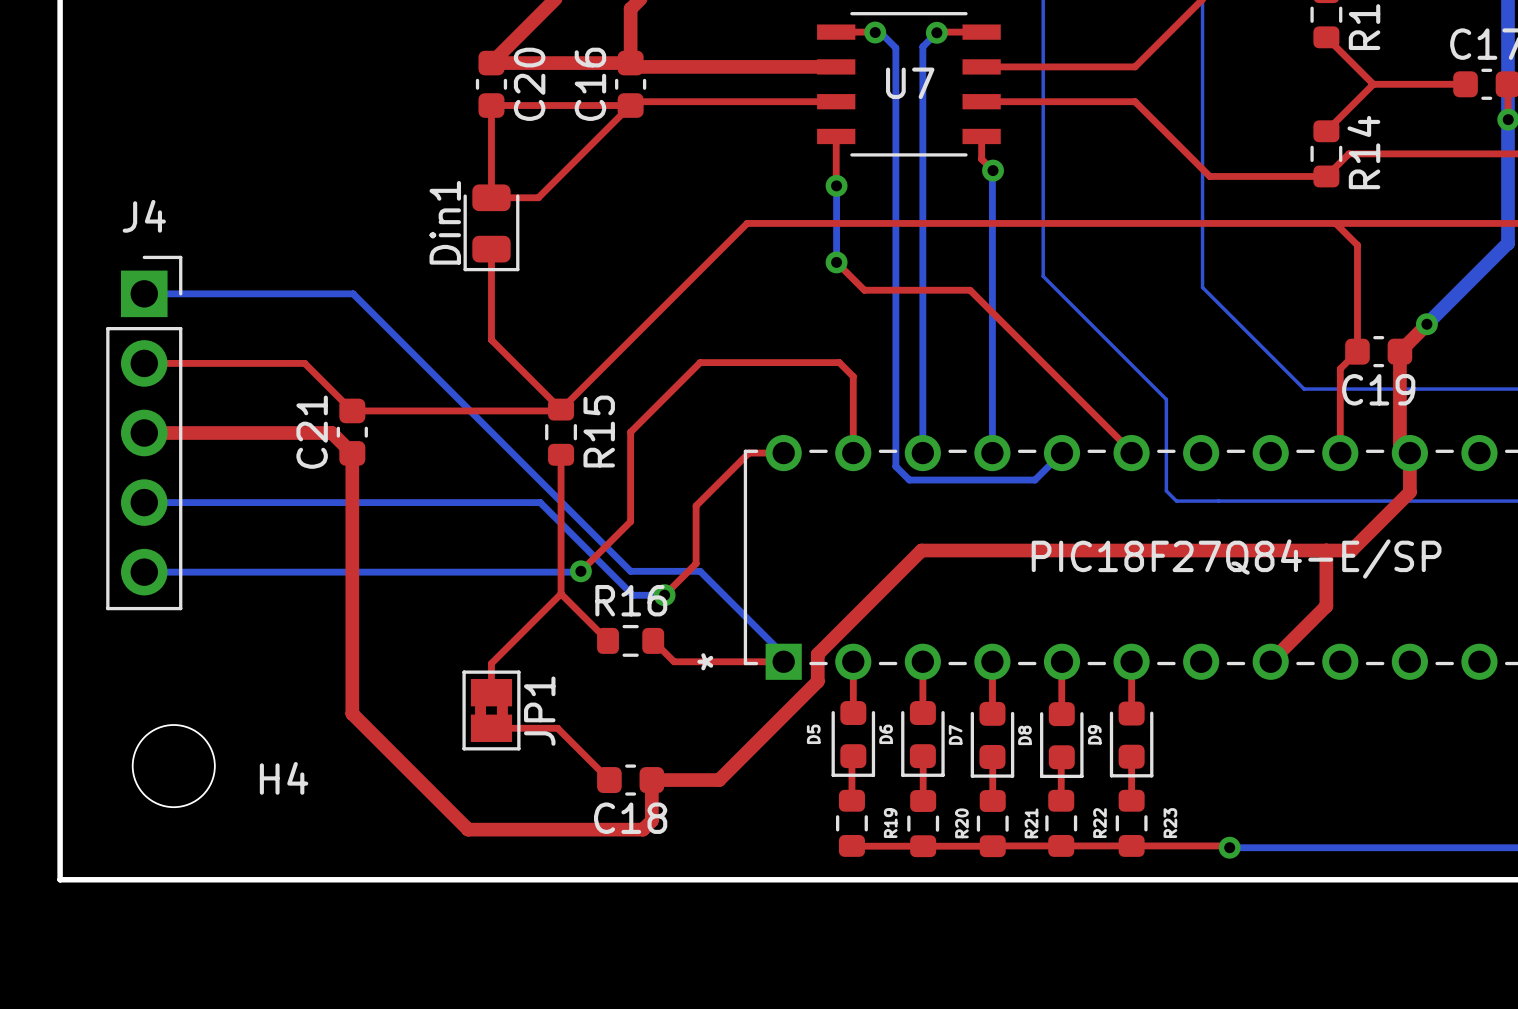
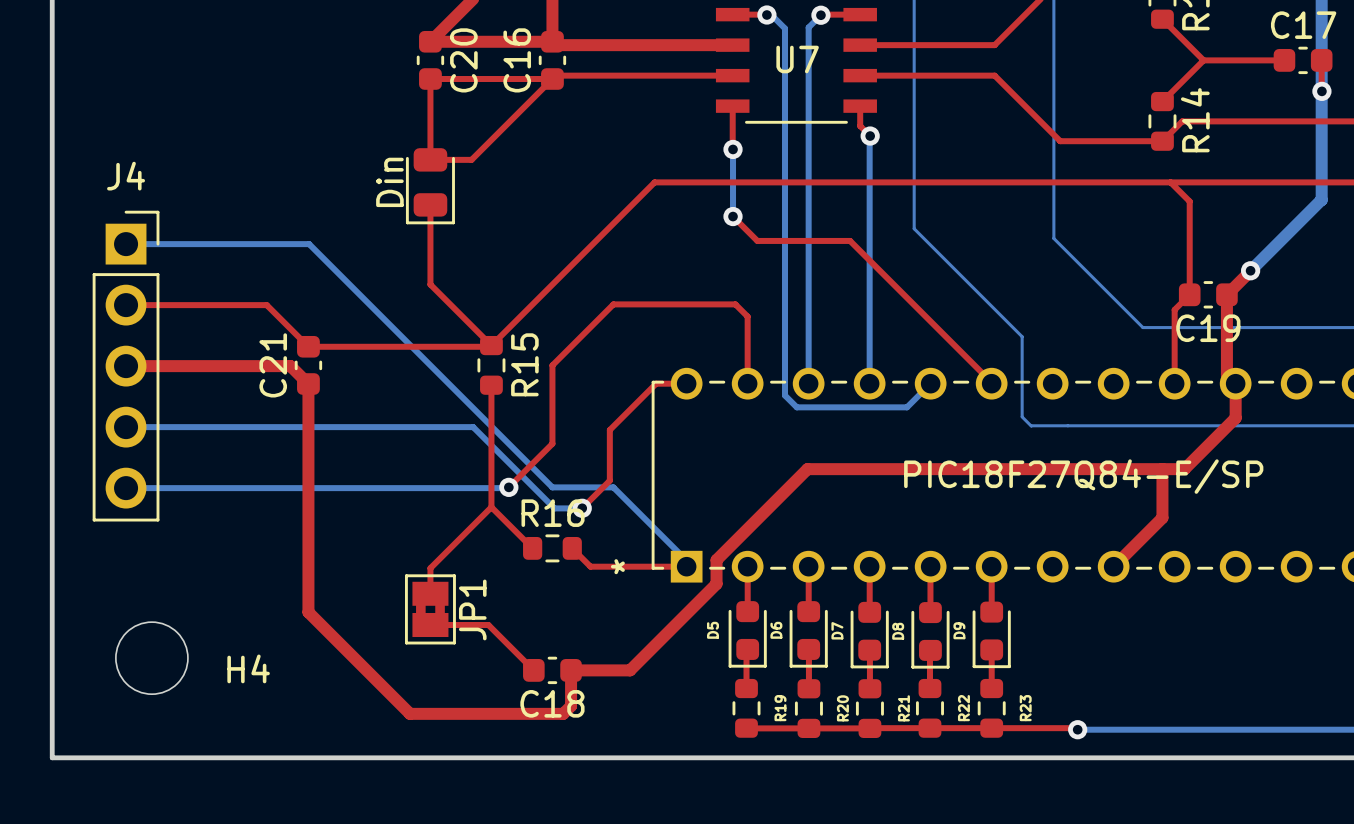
Din1 name: Din1 (445, 222) -> Din (389, 182)

